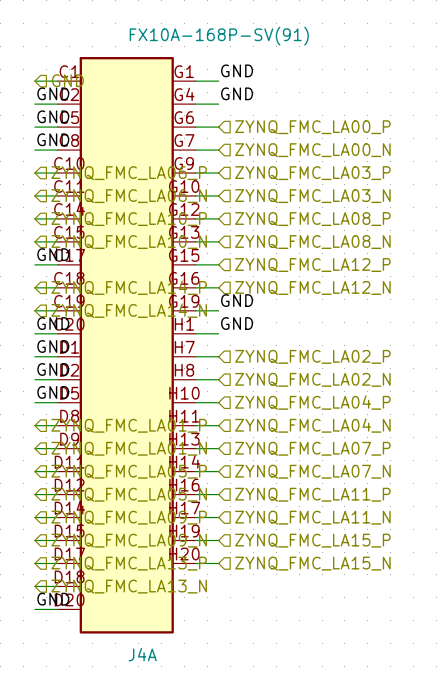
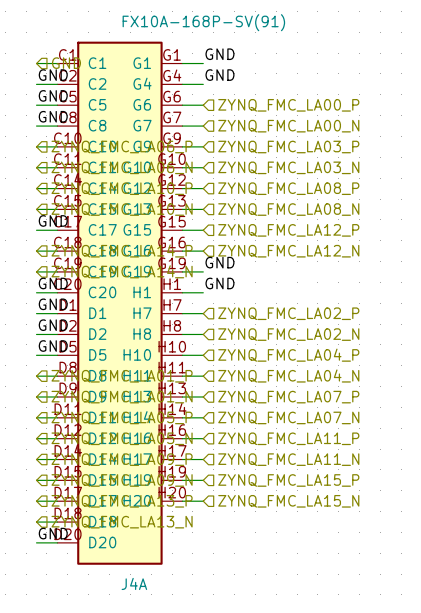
J4A symbol: [57, 57, 196, 634] -> [57, 41, 183, 565]

